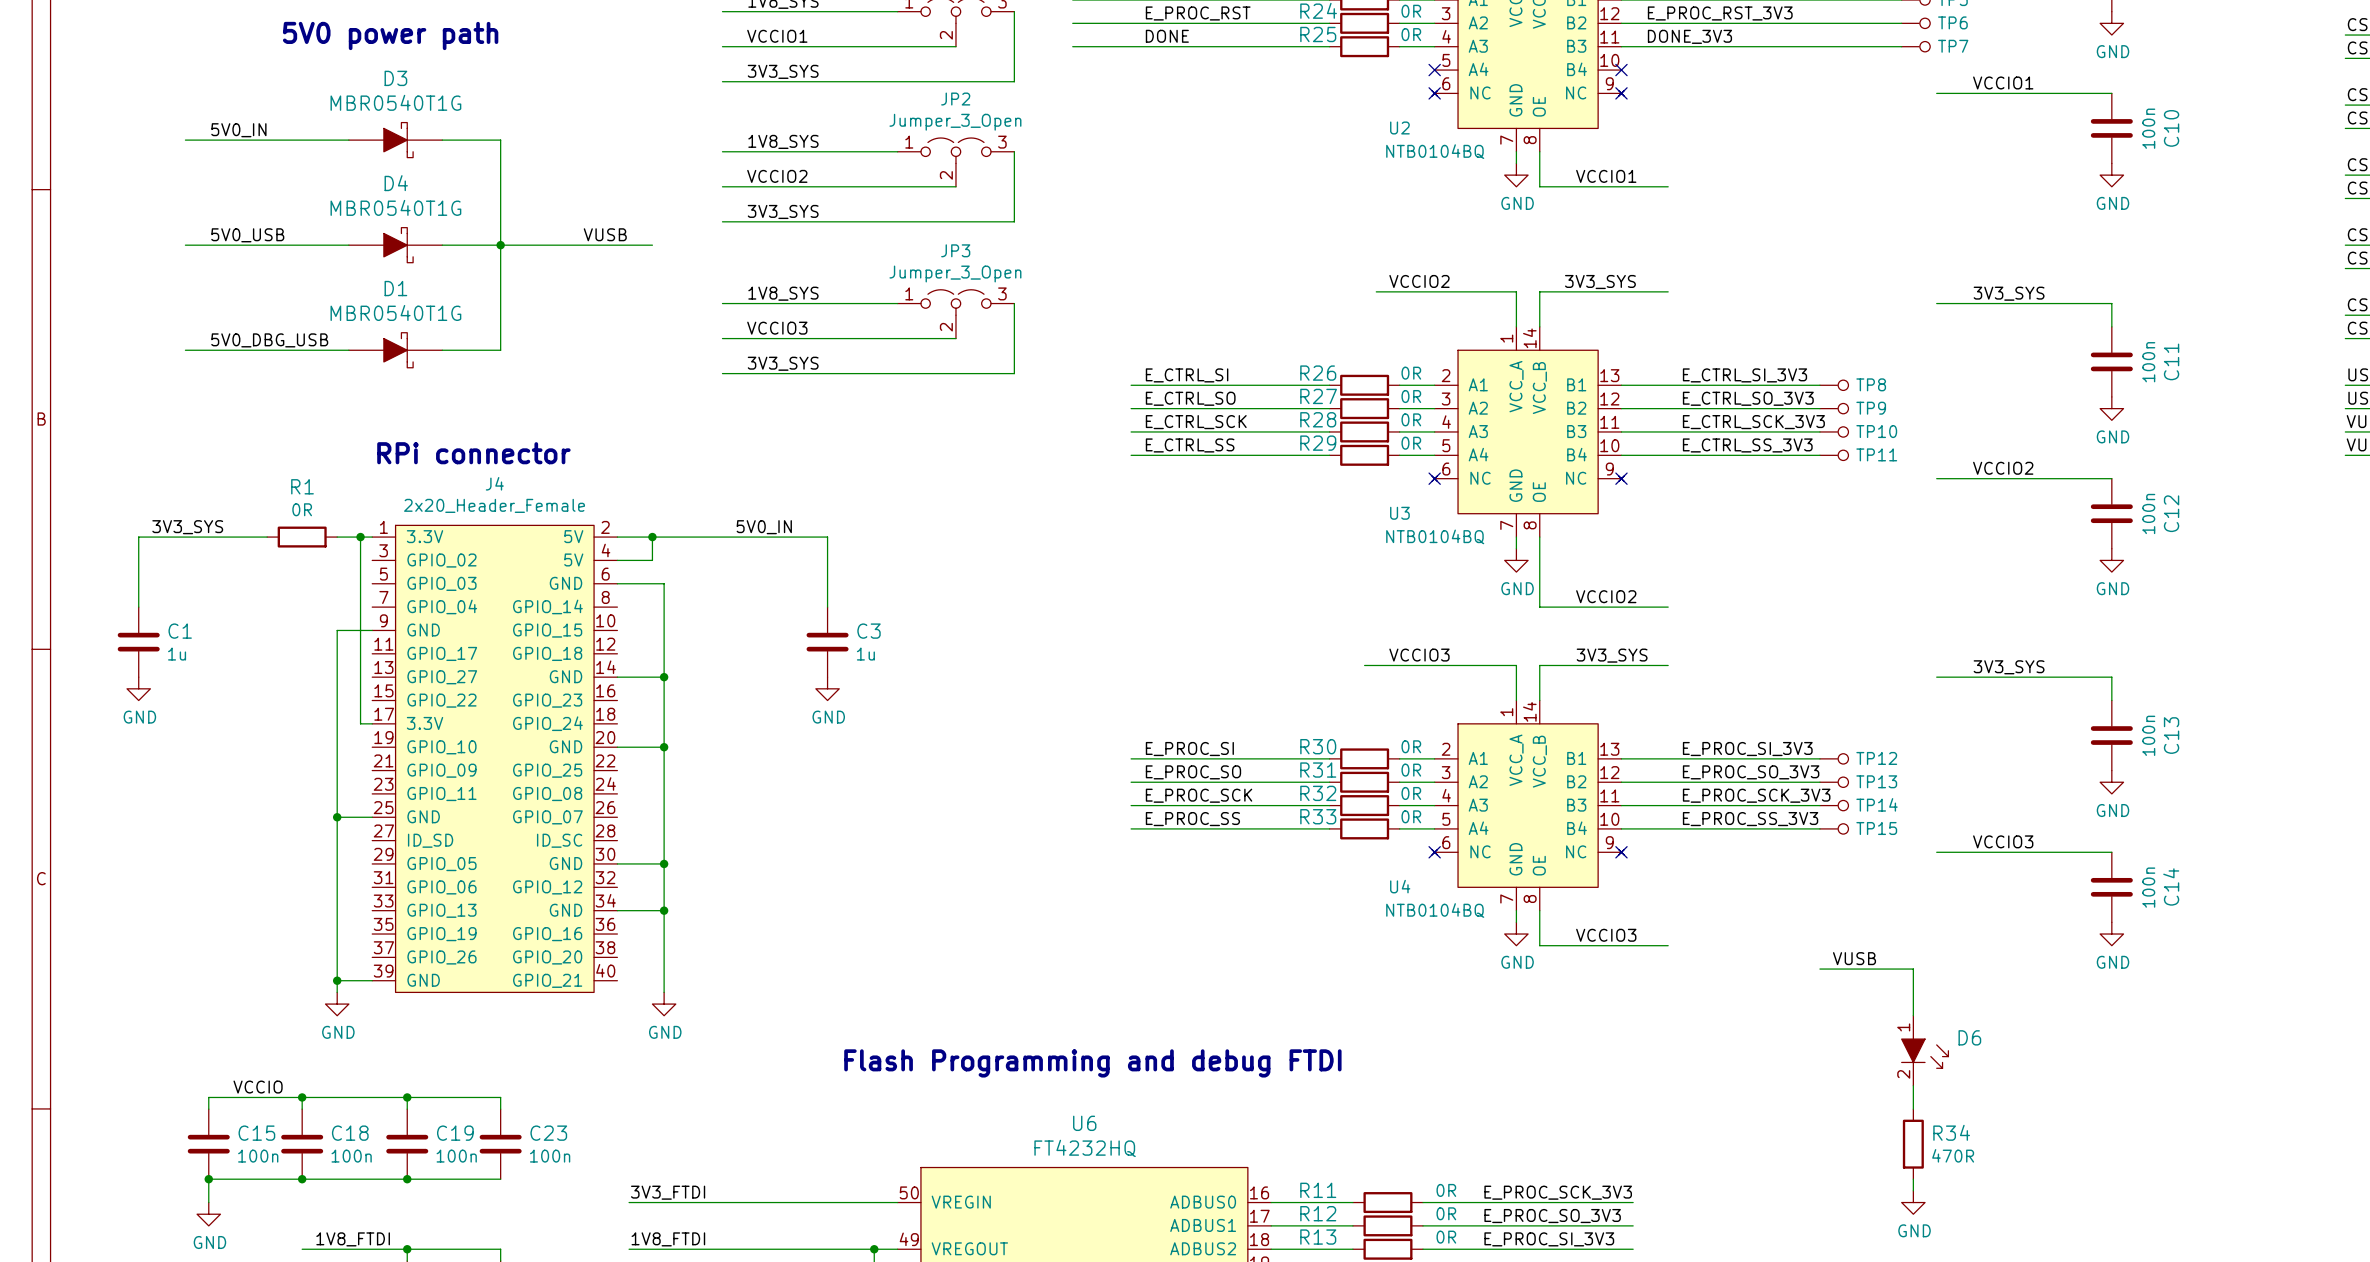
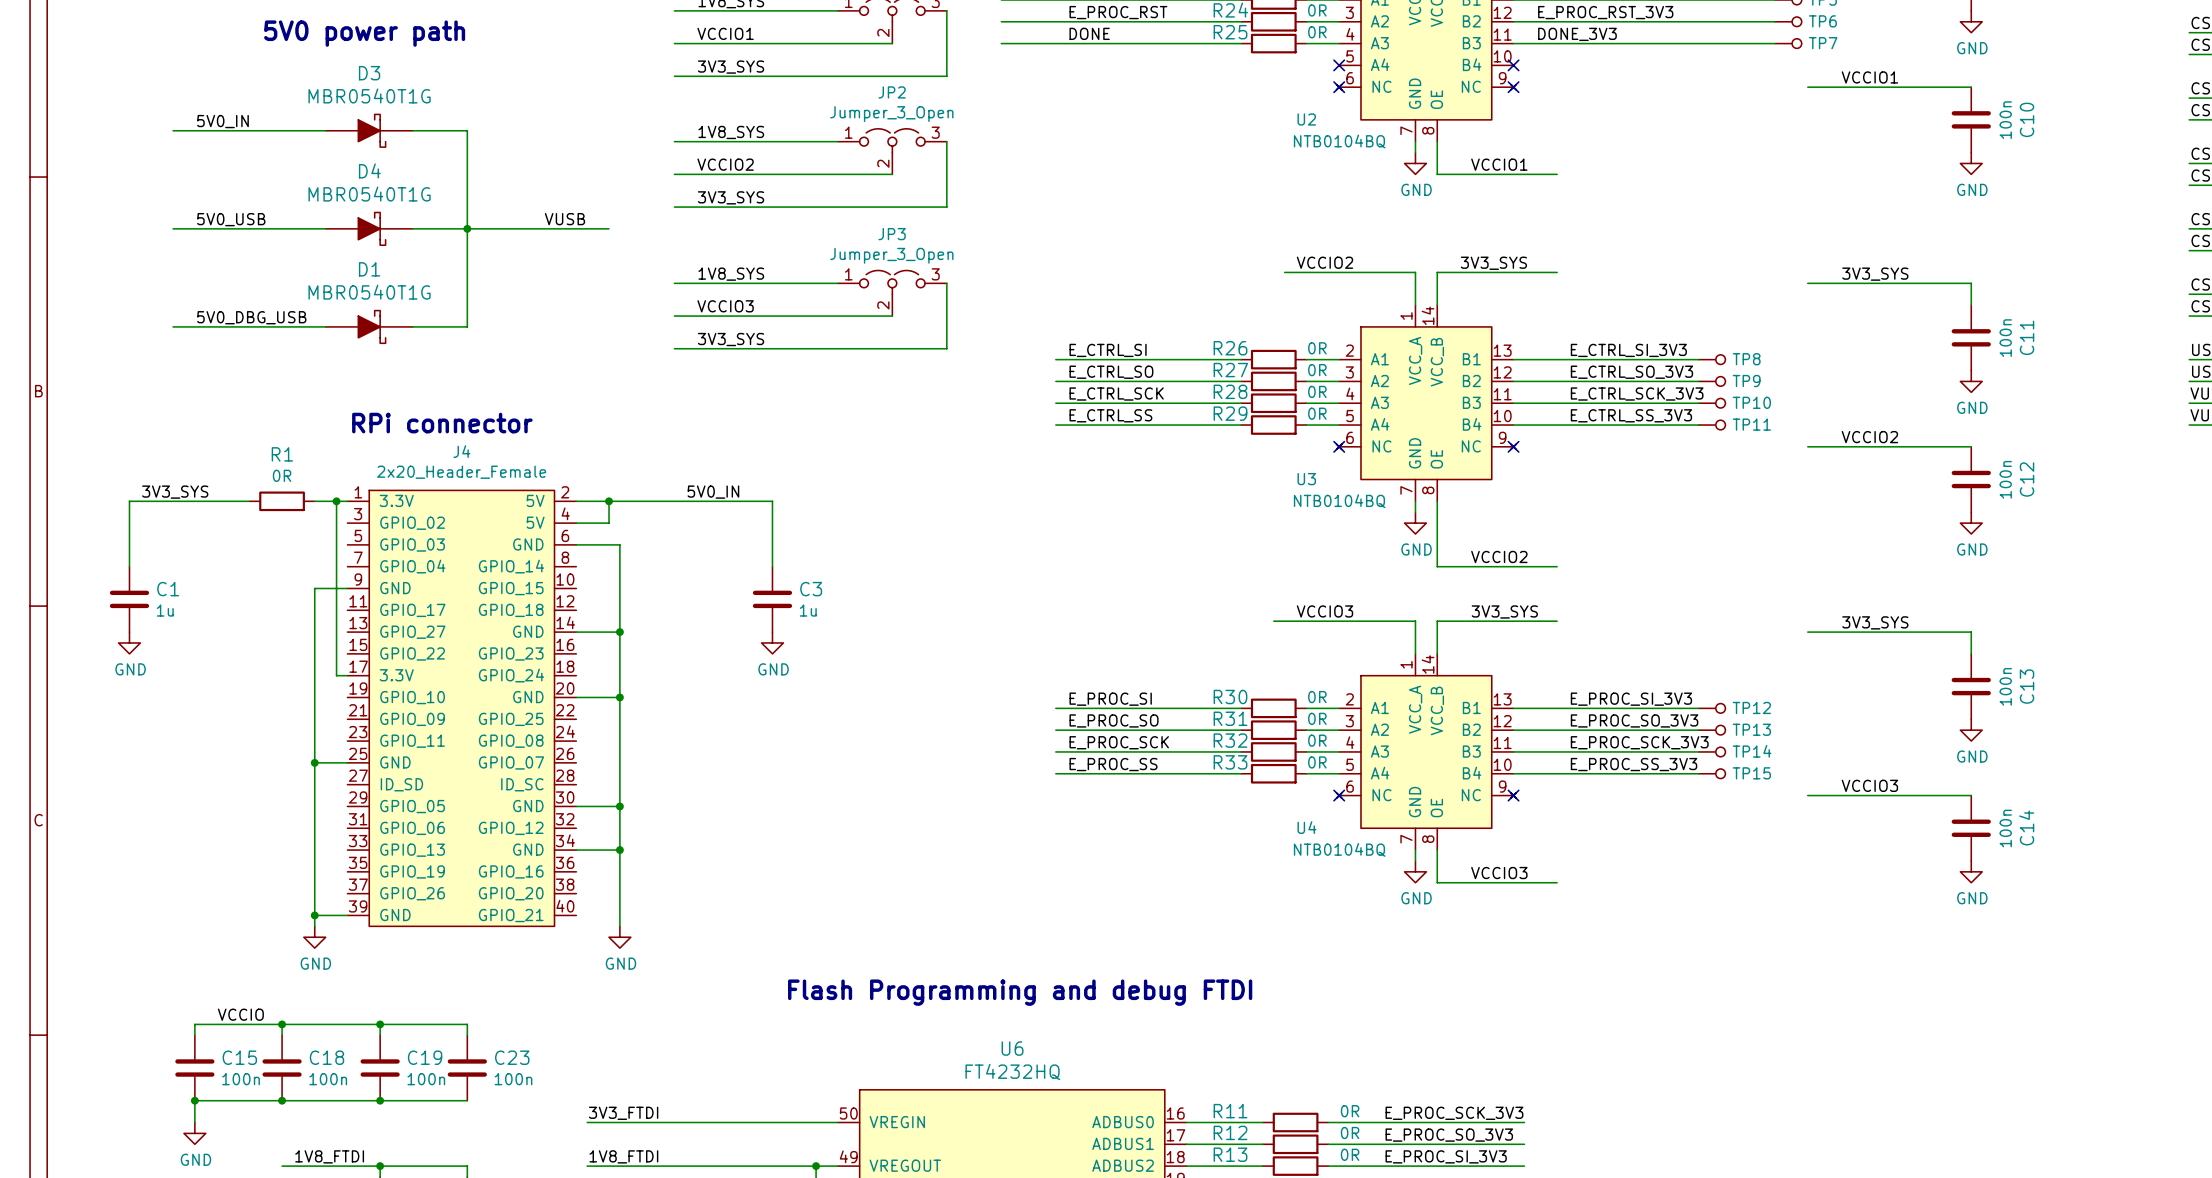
label: VUSB (1854, 958) -> none
wire: (1819, 969) (1913, 969) (1913, 1015) -> none
D6: (1925, 1050) -> none
wire: (1913, 1085) (1913, 1109) -> none
R34: (1913, 1144) -> none
wire: (1913, 1179) (1913, 1190) -> none
power symbol: GND (1913, 1202) -> none

